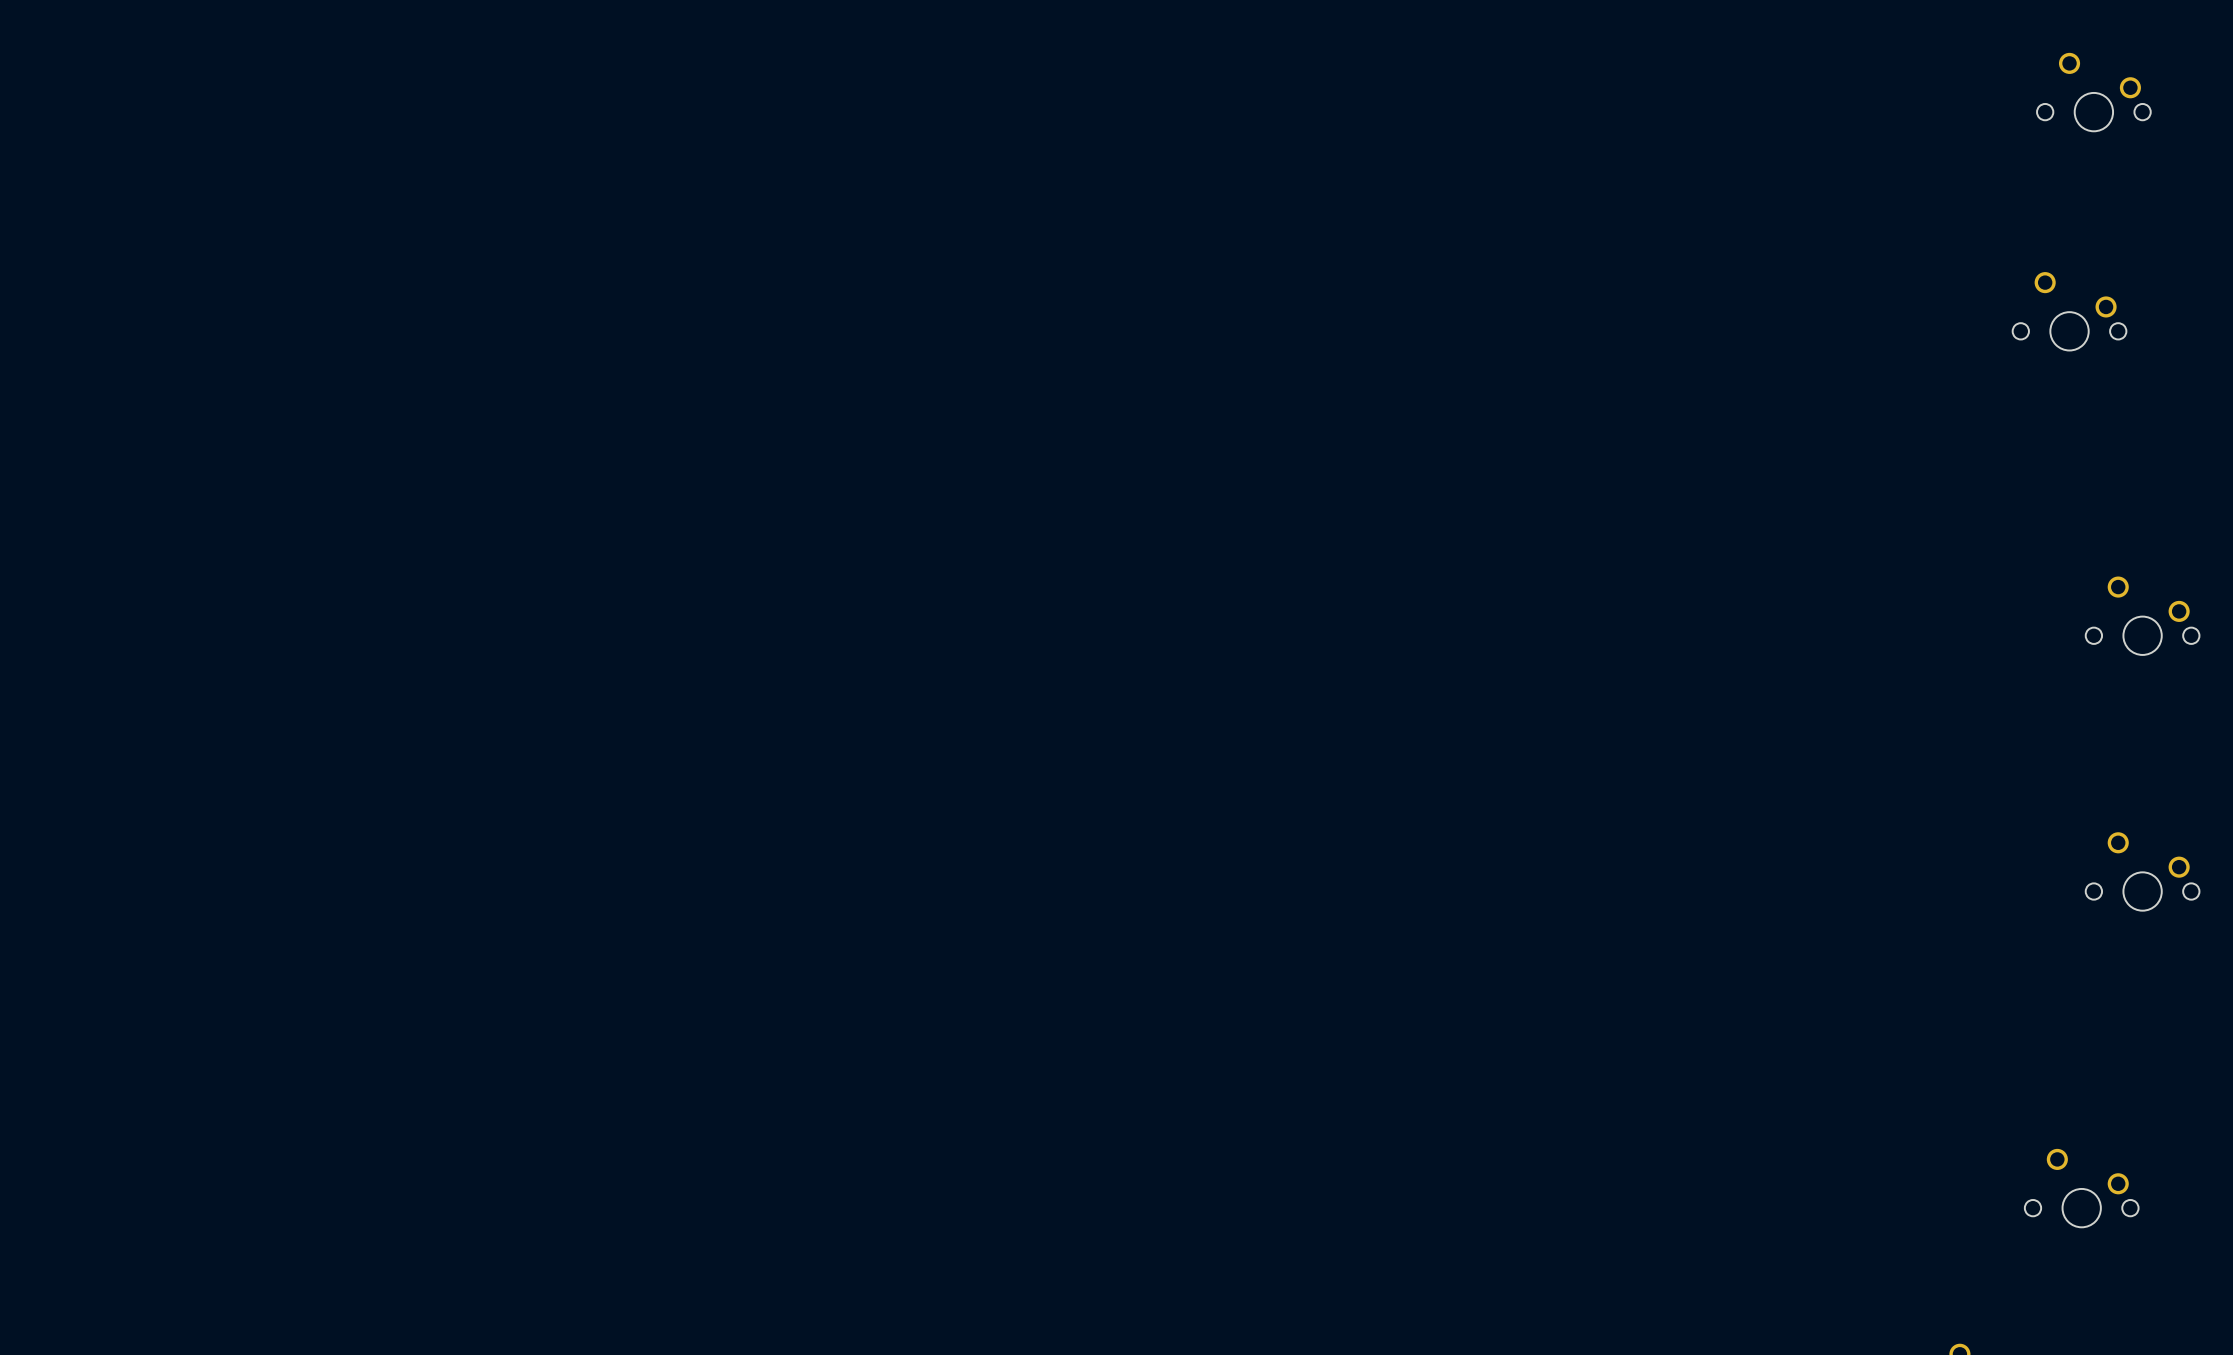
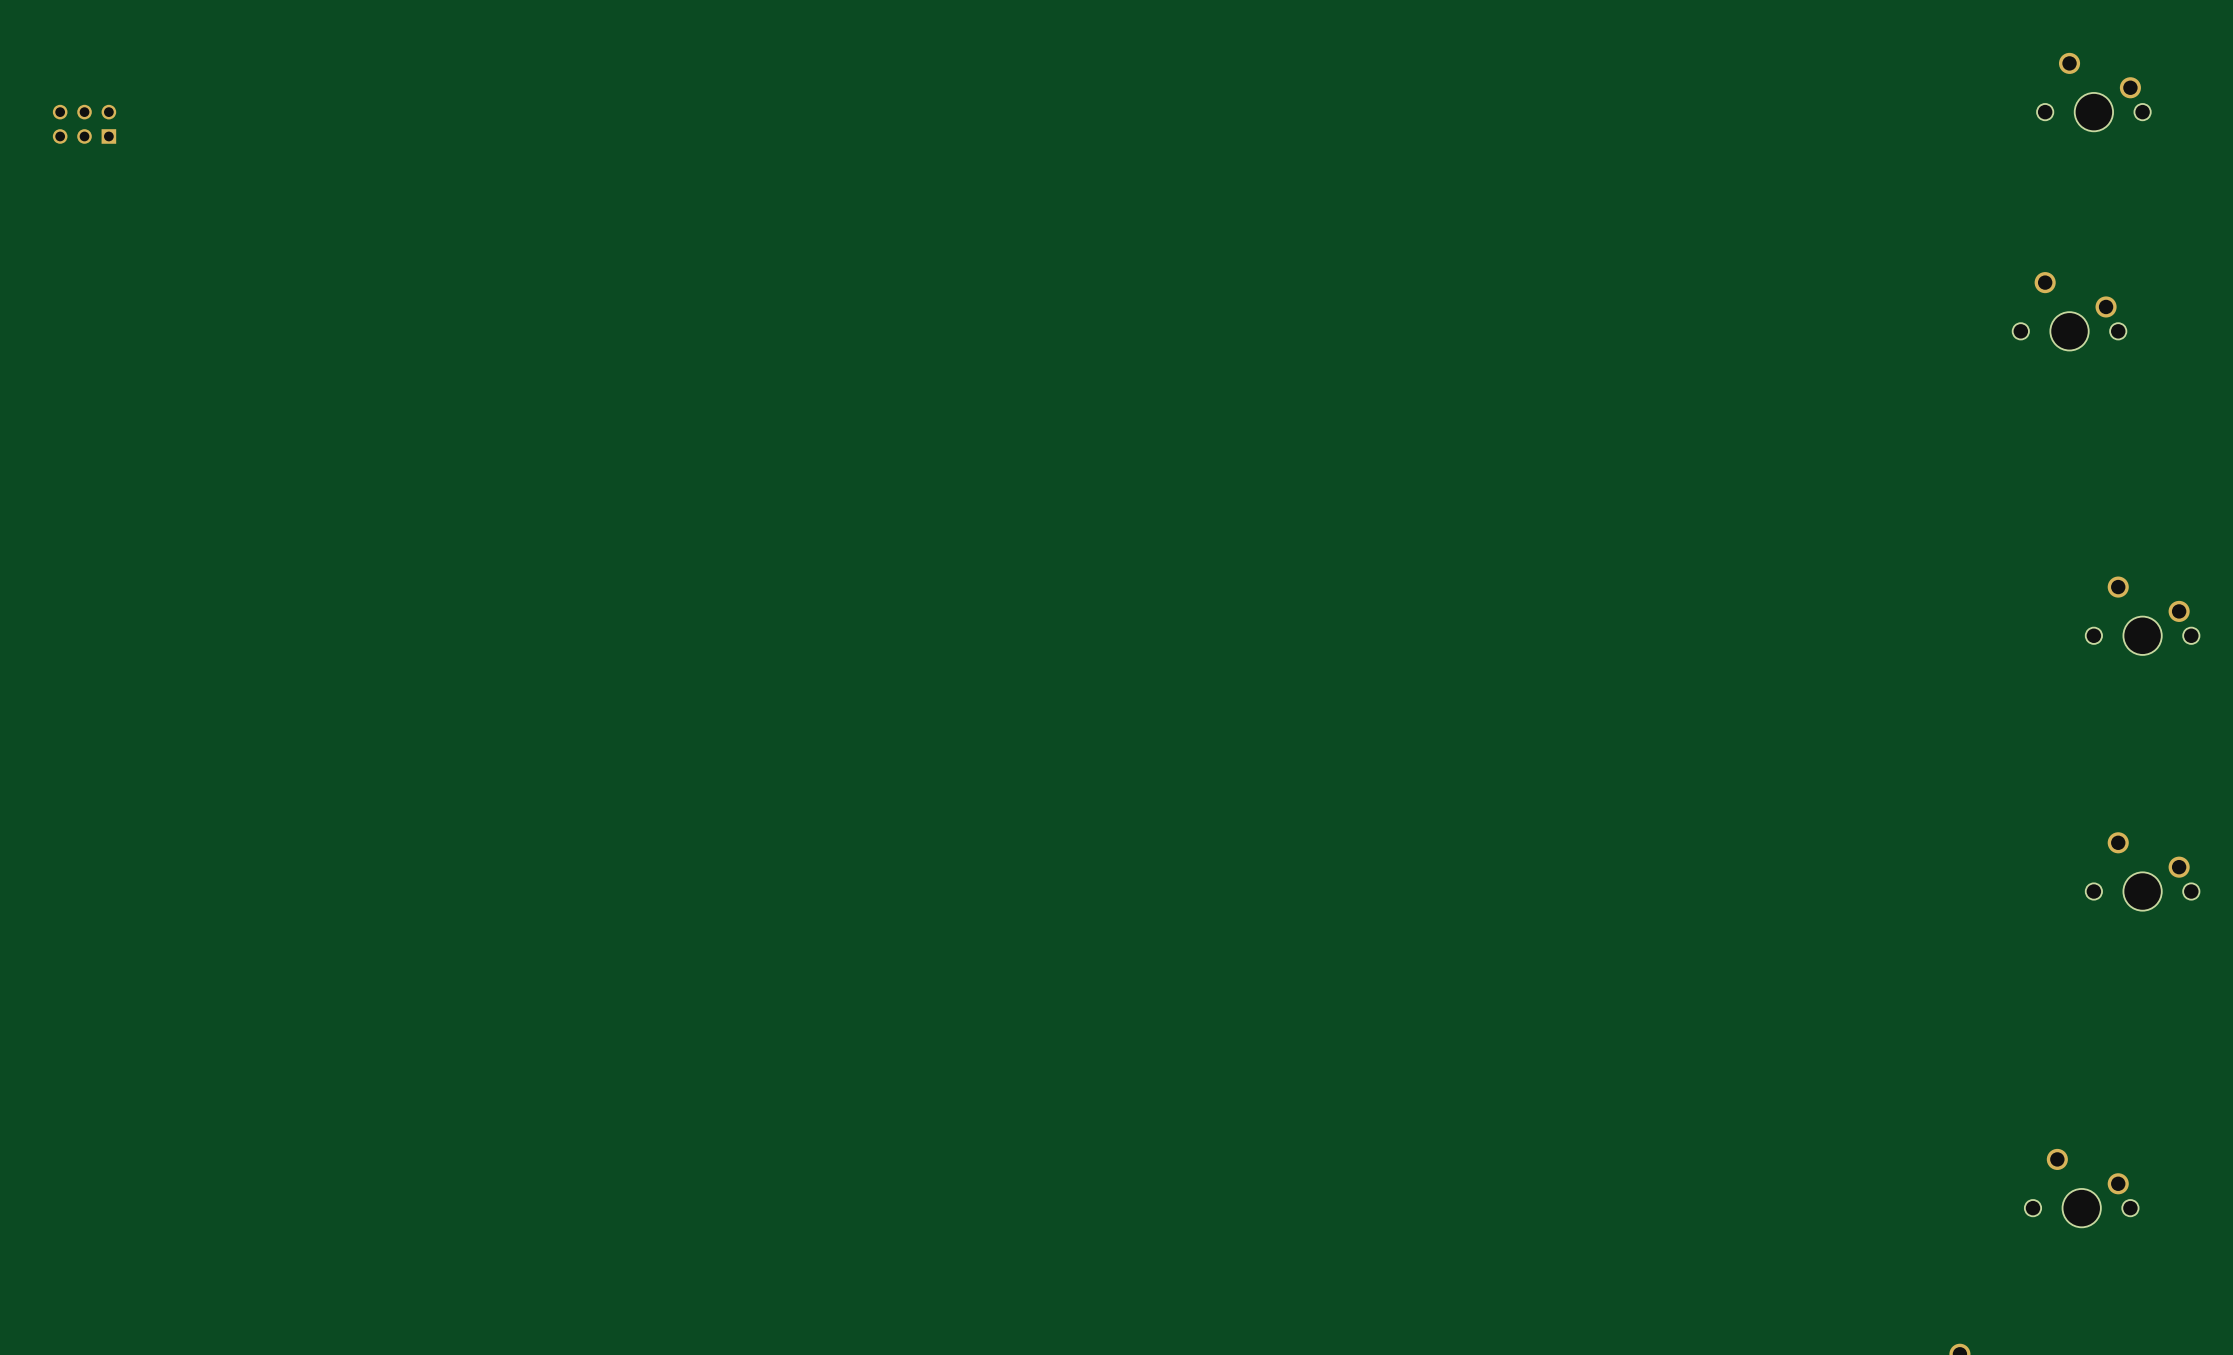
part: none -> (84, 124)

